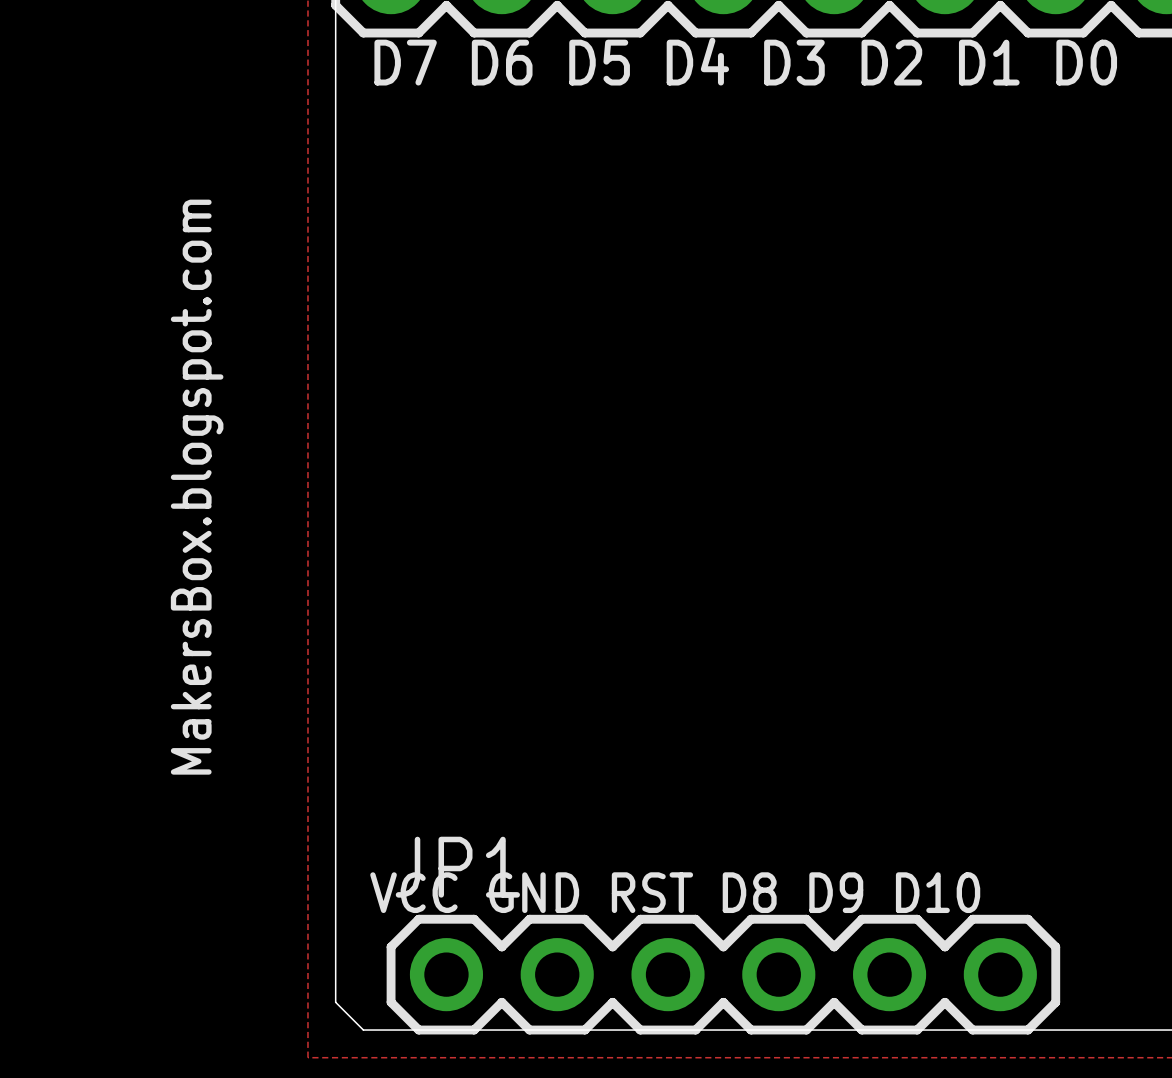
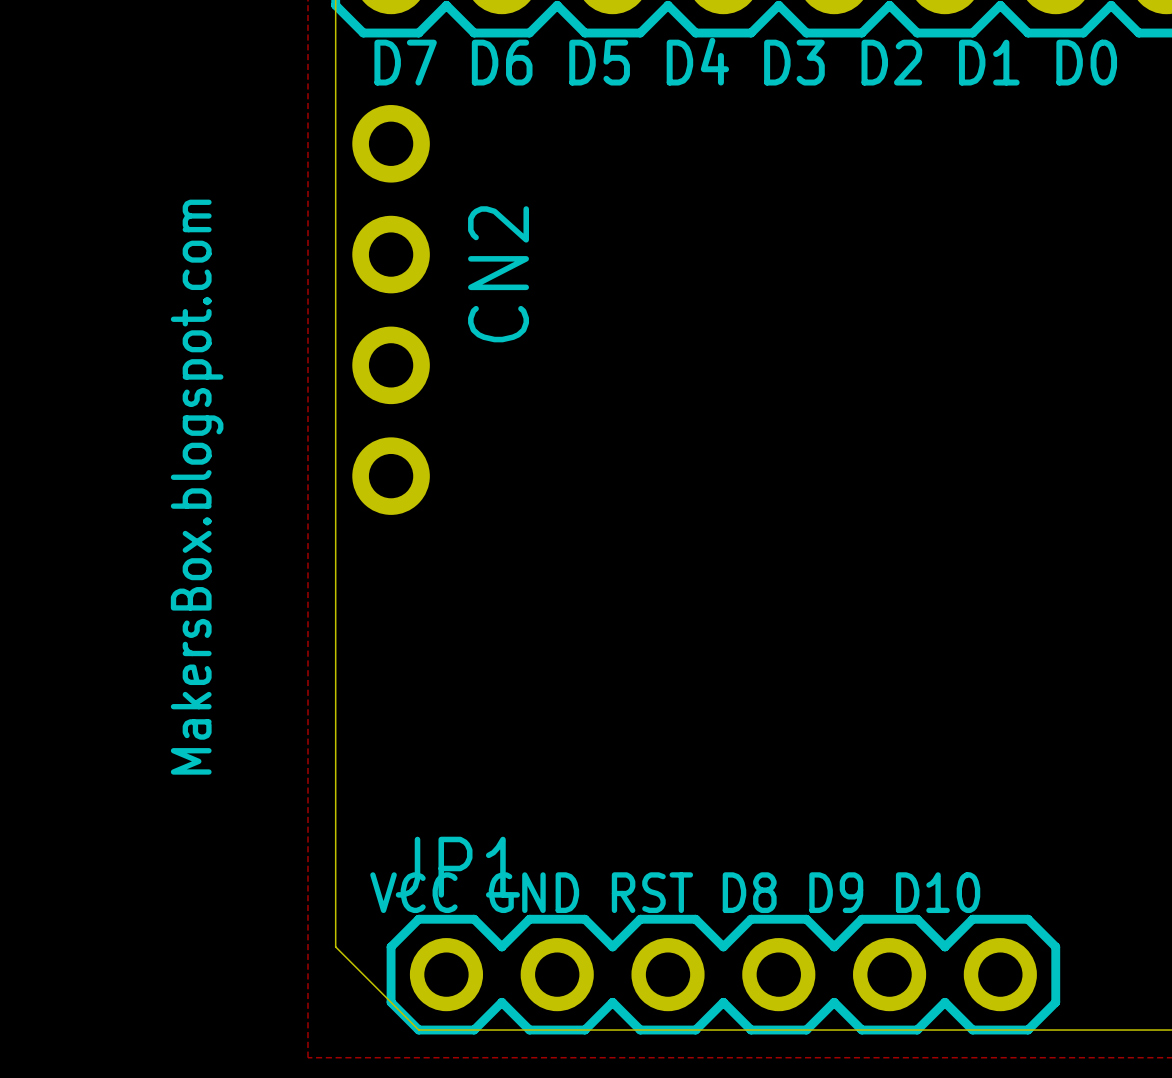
CN2: none -> (391, 309)
board edge: (335, 946) (335, 1002) (363, 1030) (418, 1030) -> (335, 946) (418, 1030)

